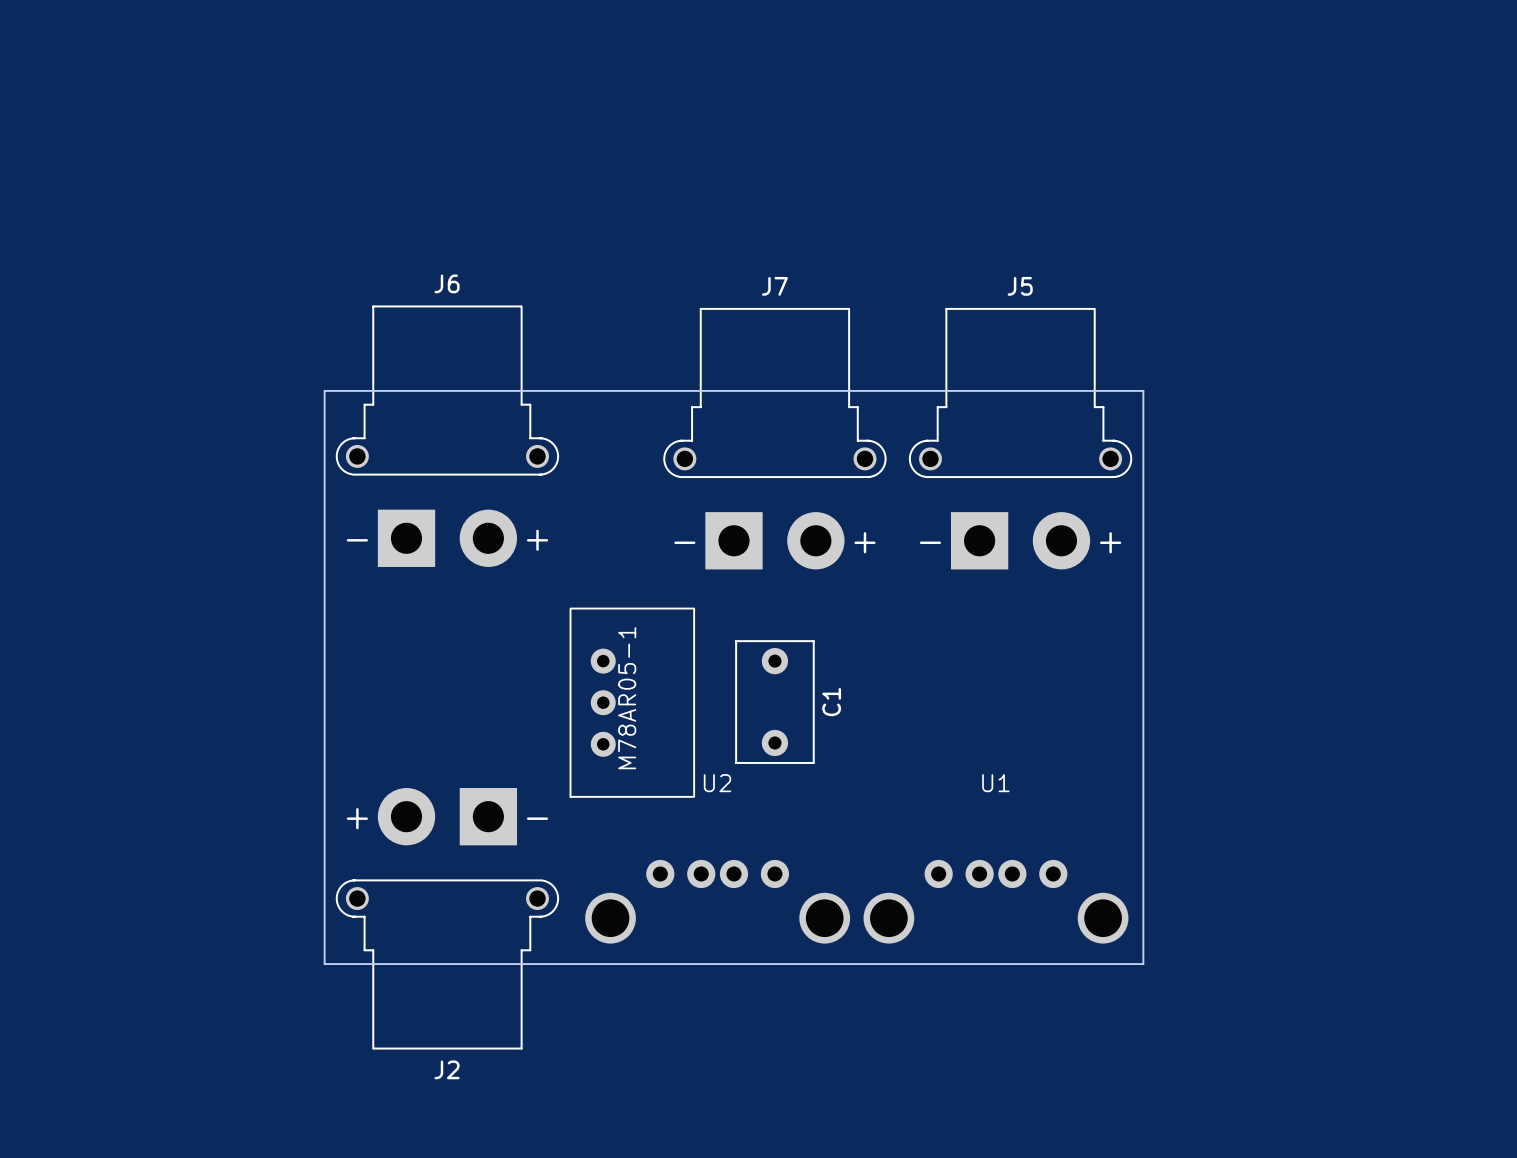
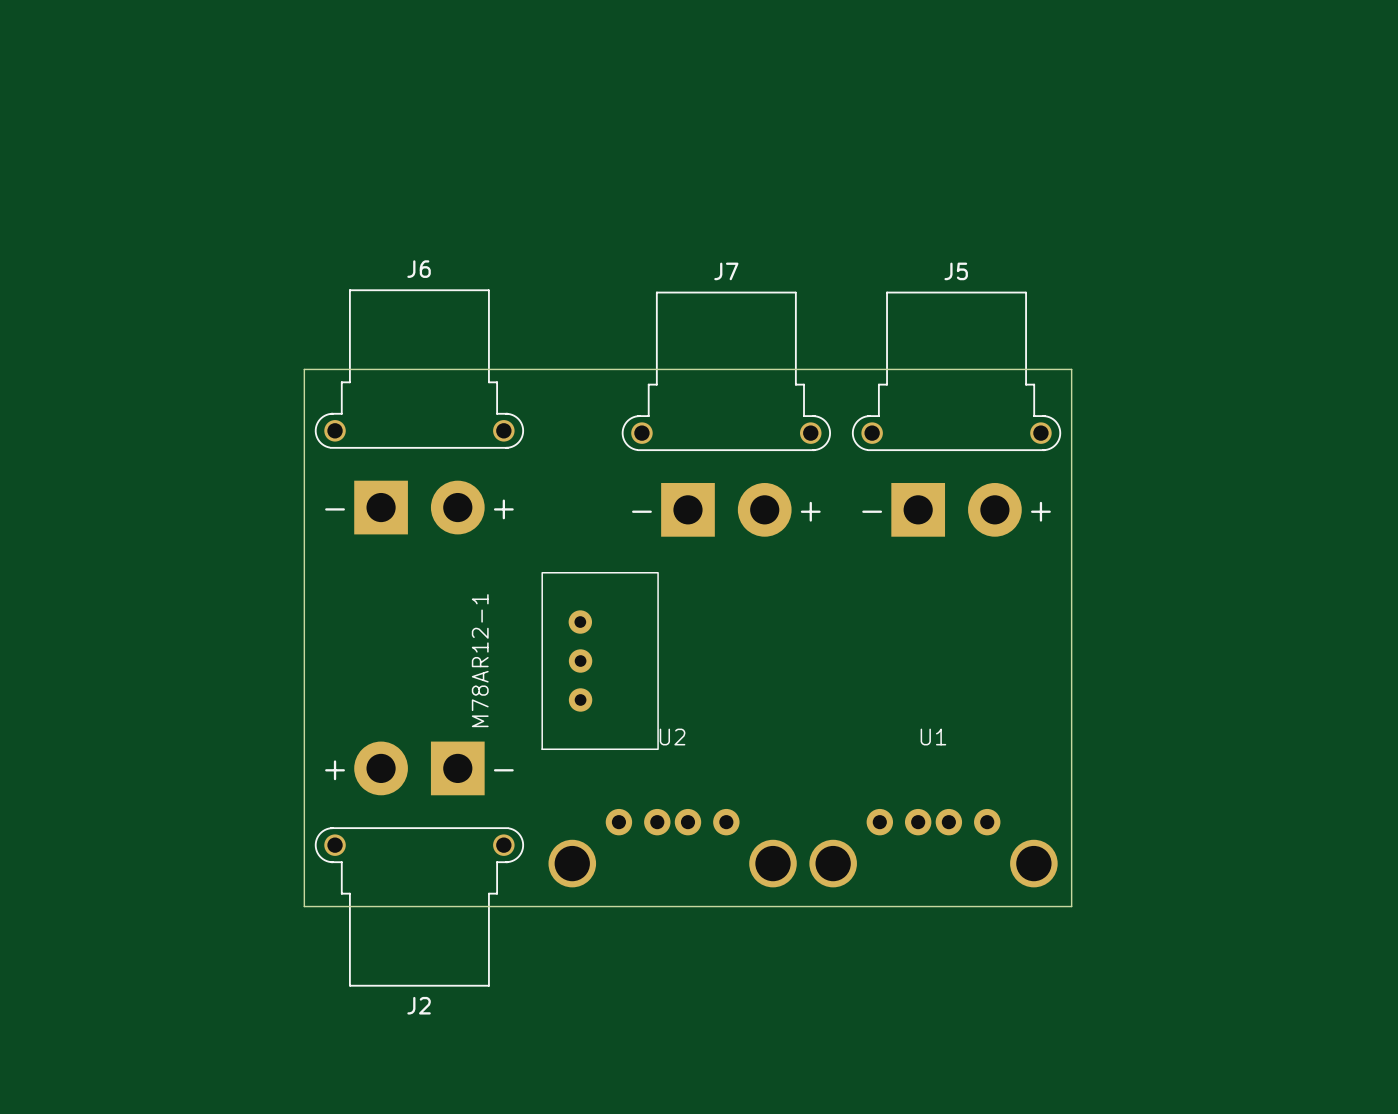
M78AR05-1: (632, 702) -> none
M78AR12-1: none -> (600, 661)
C1: (774, 702) -> none

